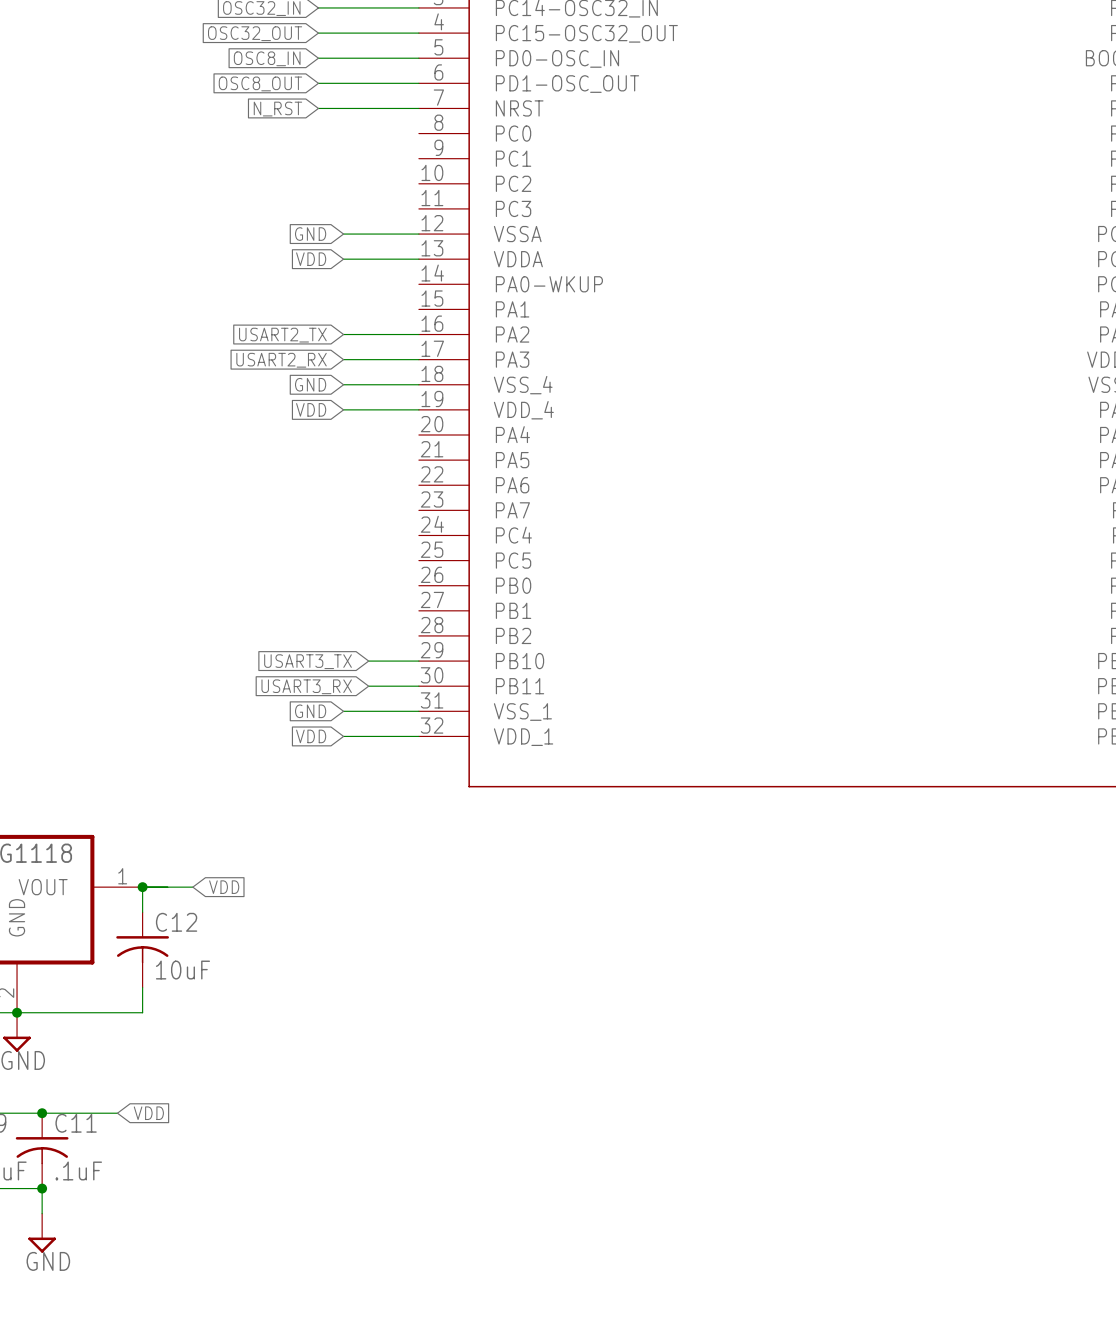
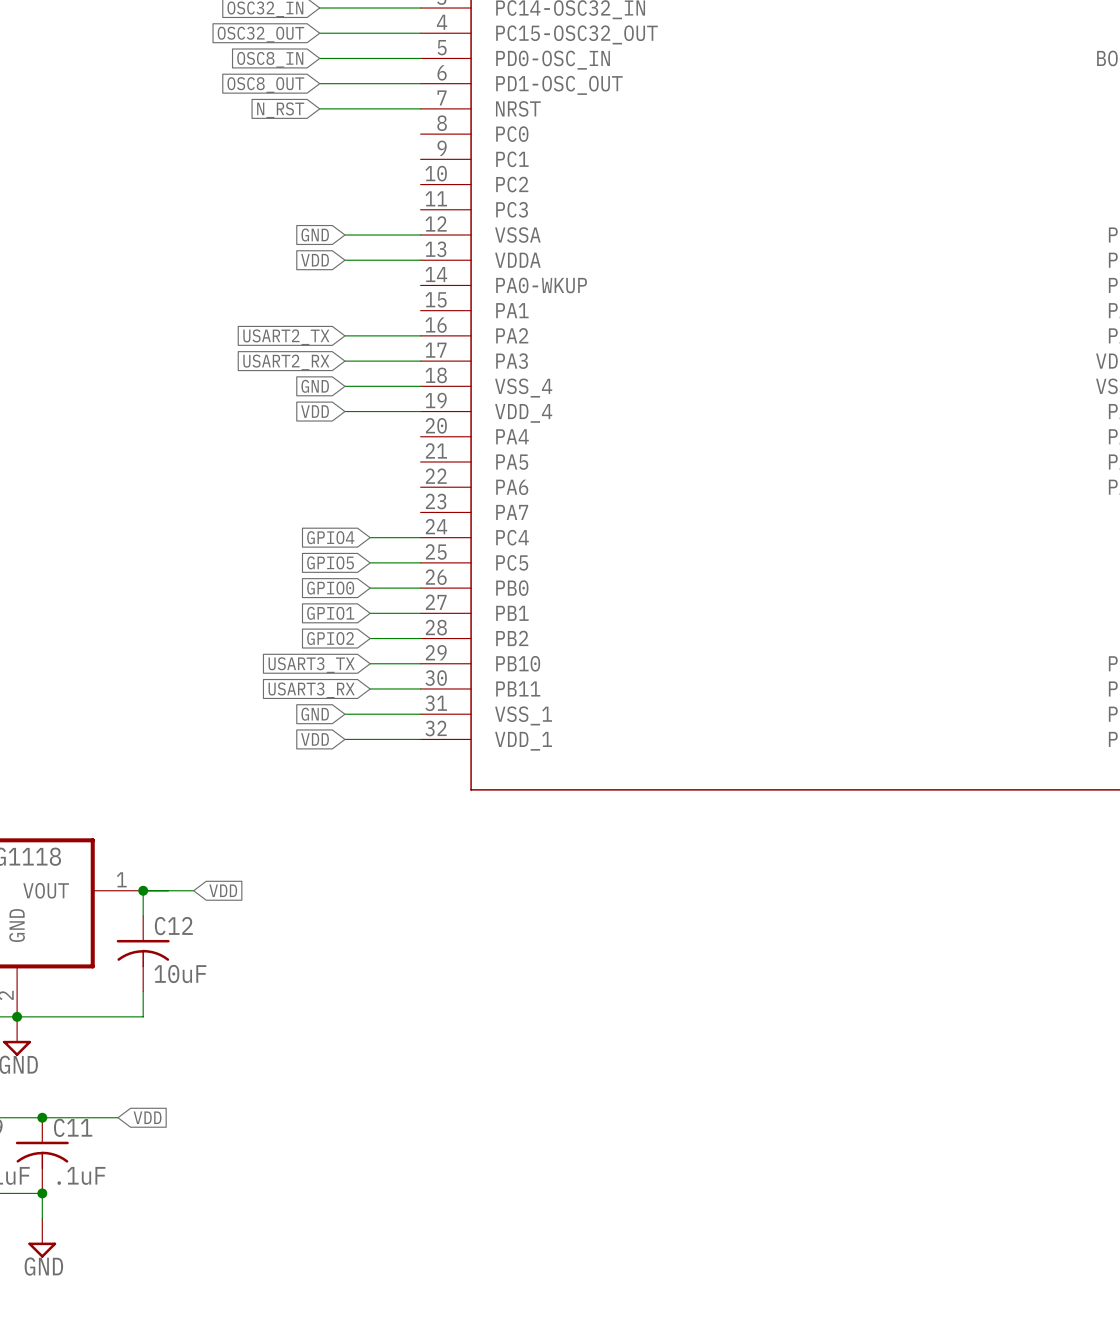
global label: none -> GPIO4 (330, 537)
wire: none -> (370, 537) (420, 537)
global label: none -> GPIO5 (330, 562)
wire: none -> (370, 562) (420, 562)
global label: none -> GPIO0 (330, 588)
wire: none -> (370, 588) (420, 588)
global label: none -> GPIO1 (330, 613)
wire: none -> (370, 613) (420, 613)
global label: none -> GPIO2 (330, 638)
wire: none -> (370, 638) (420, 638)

